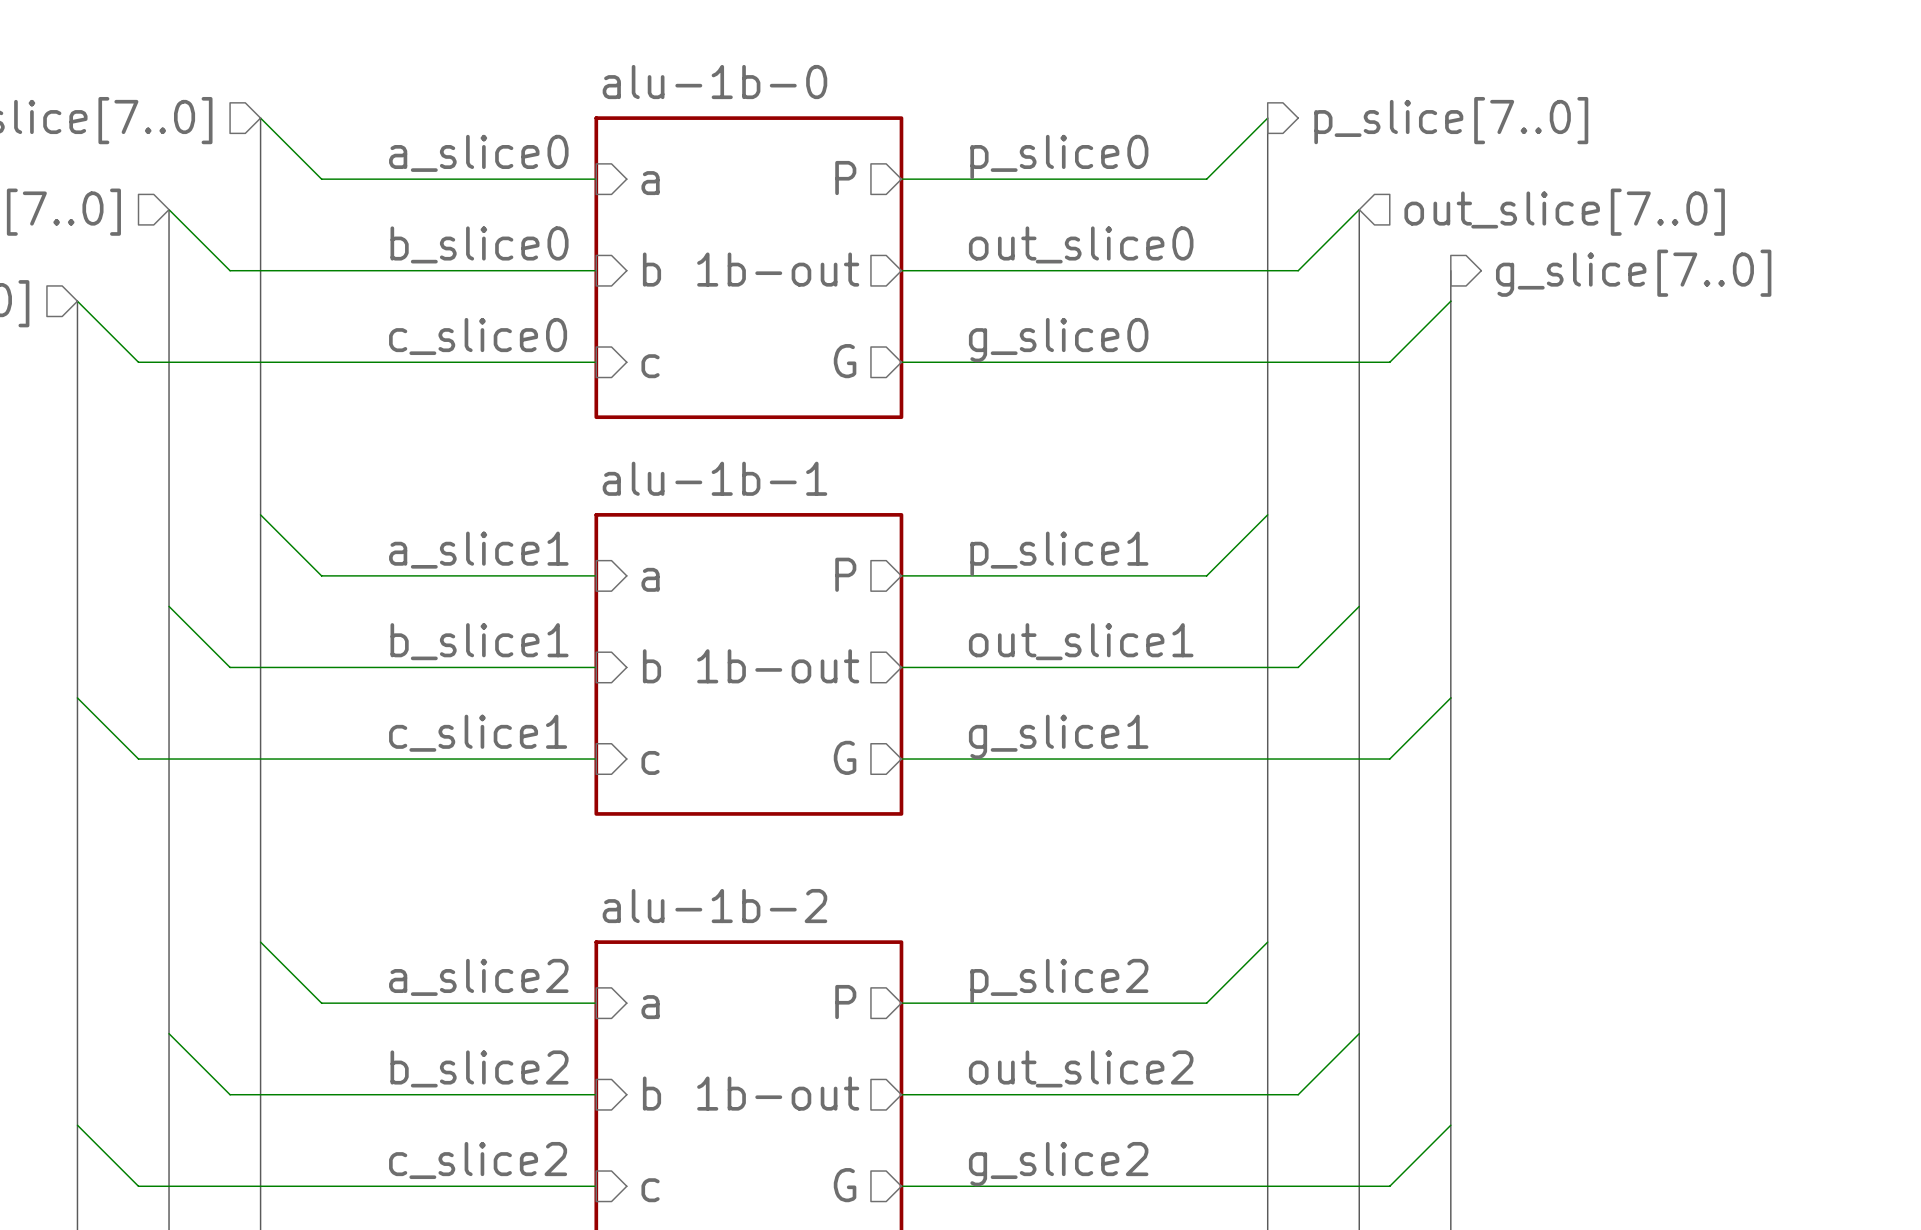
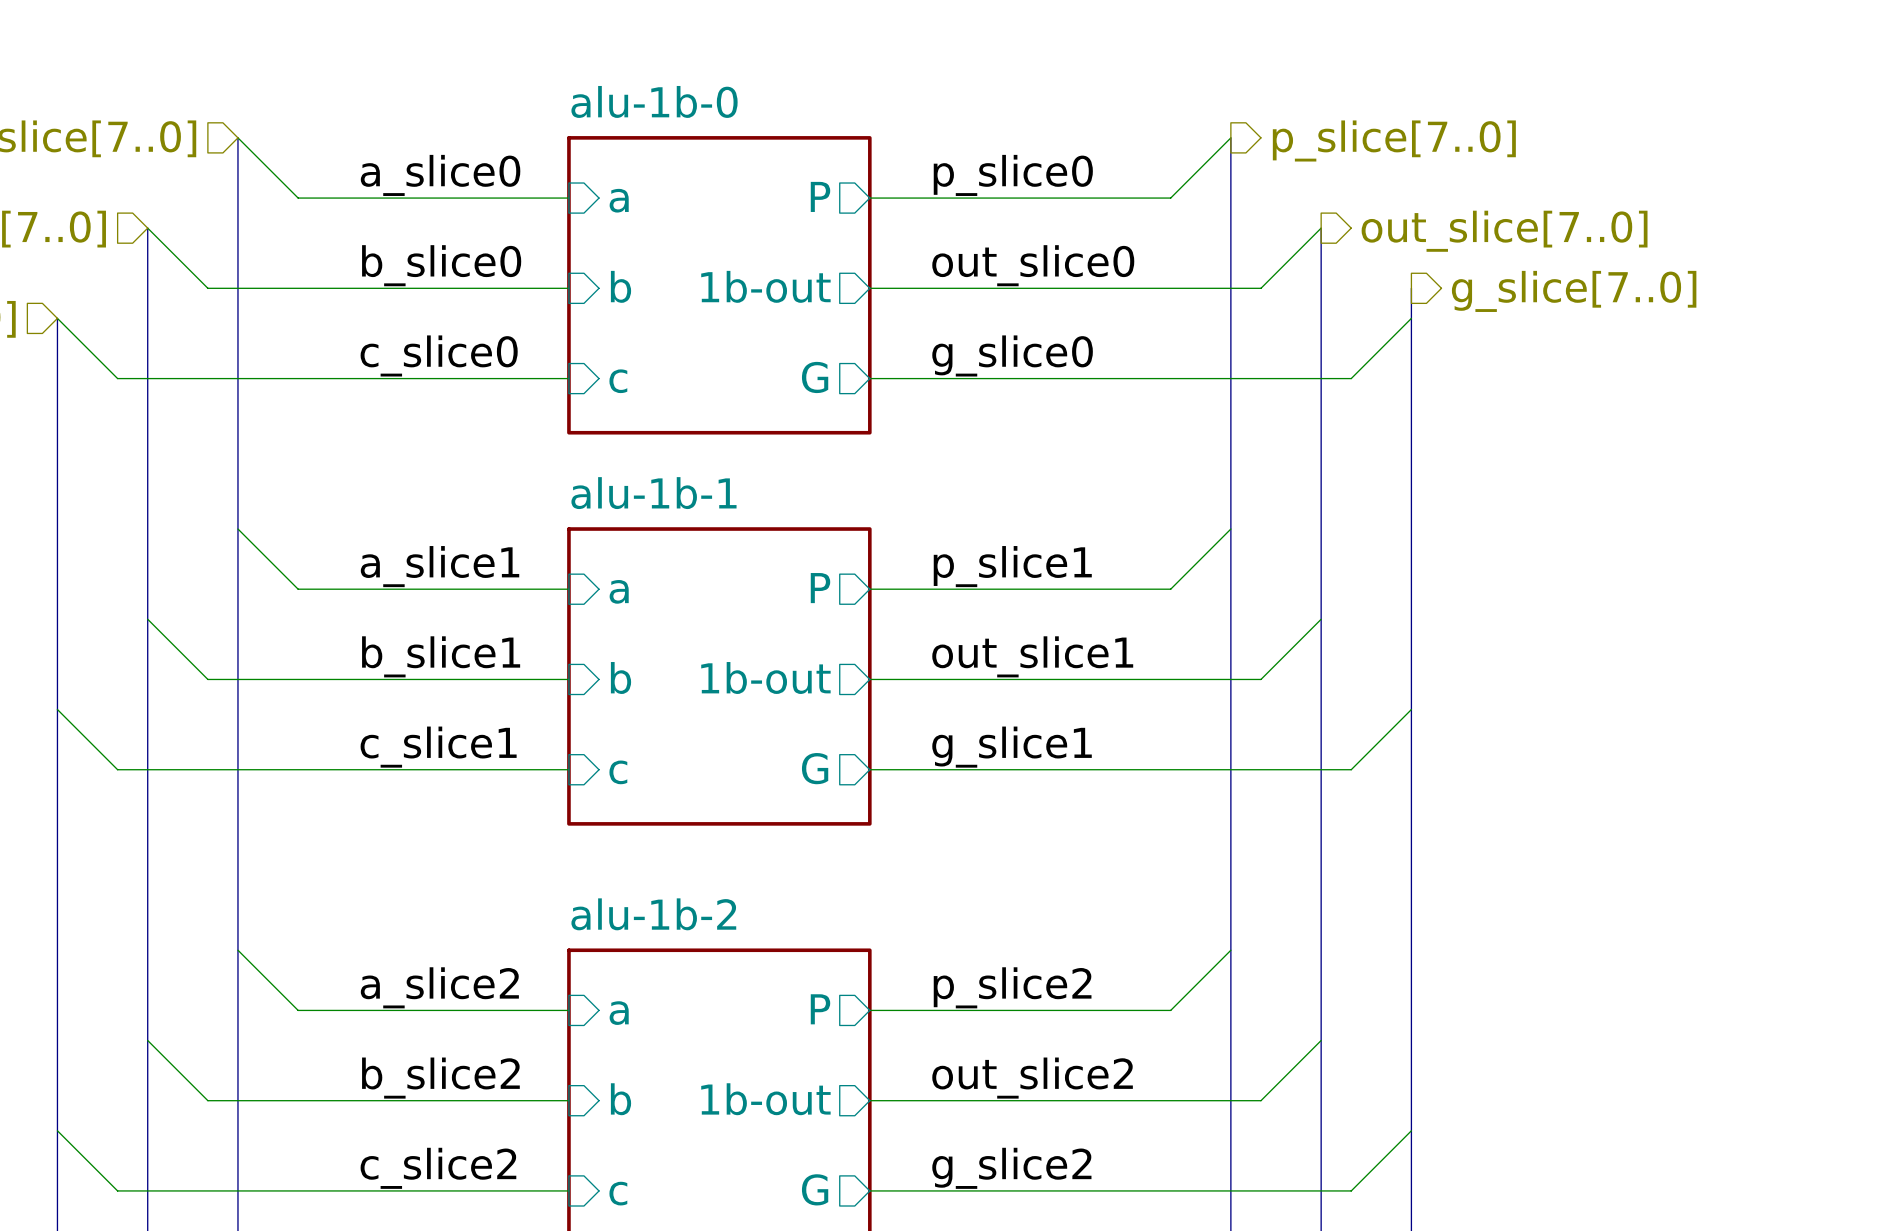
hierarchical label shape: input (1564, 212) -> output (1504, 231)

